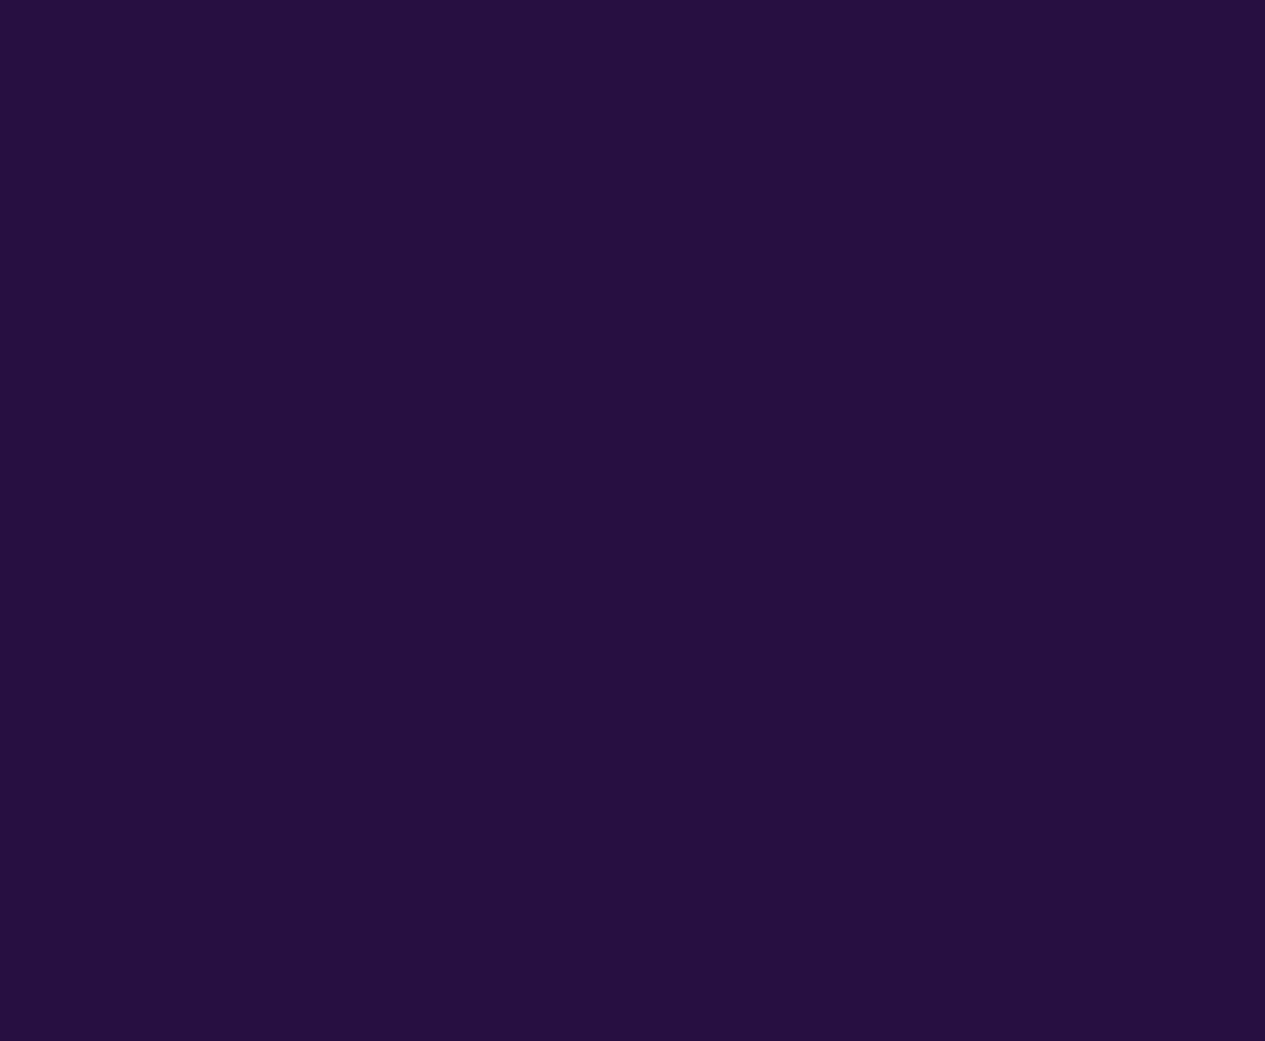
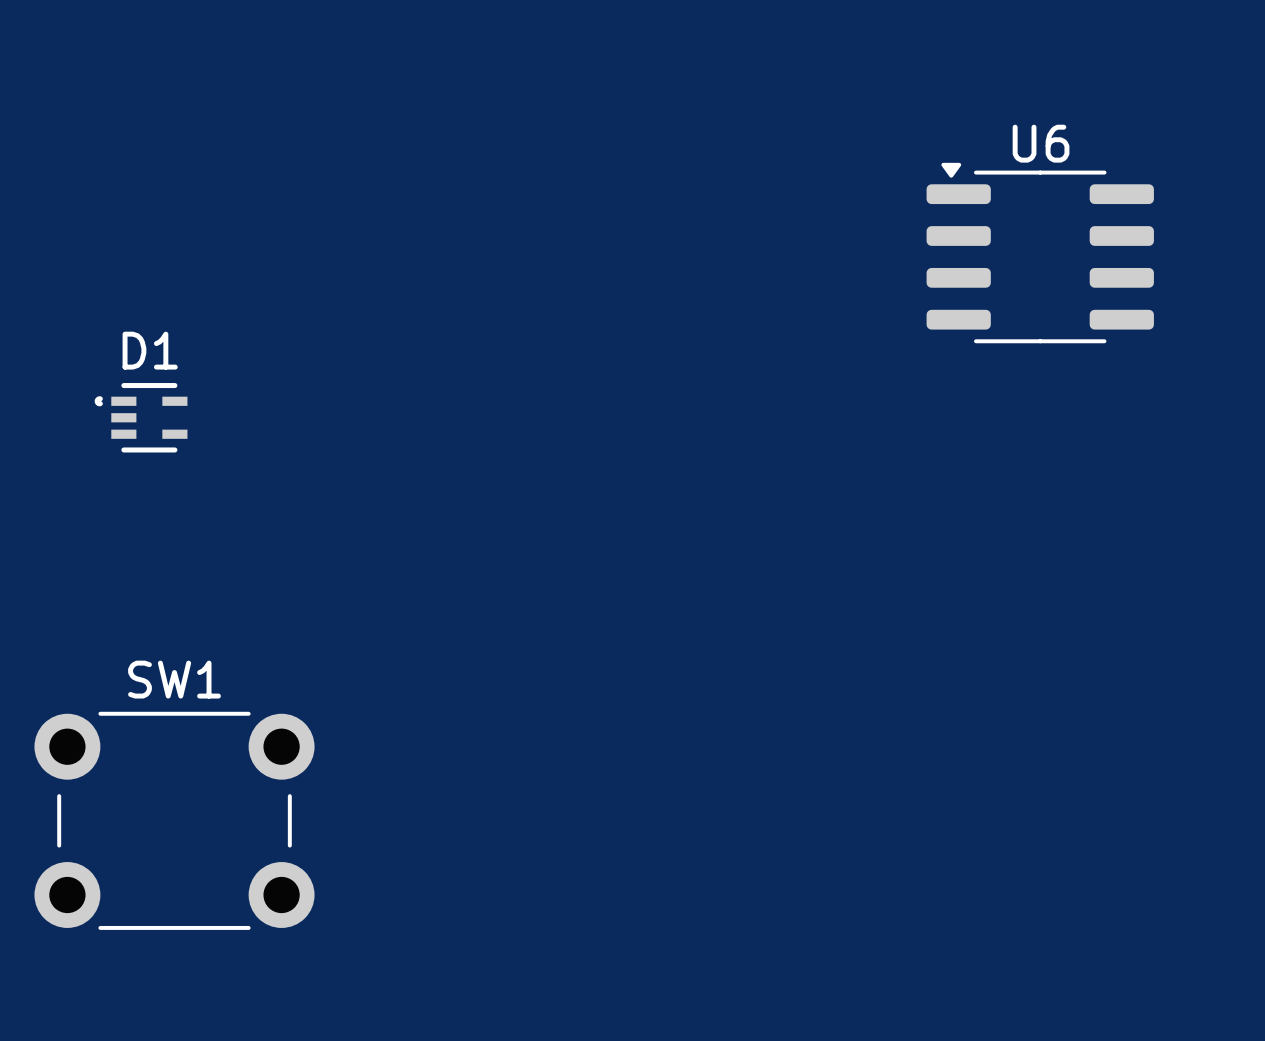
U6: none -> (1040, 253)
D1: none -> (141, 417)
SW1: none -> (174, 820)

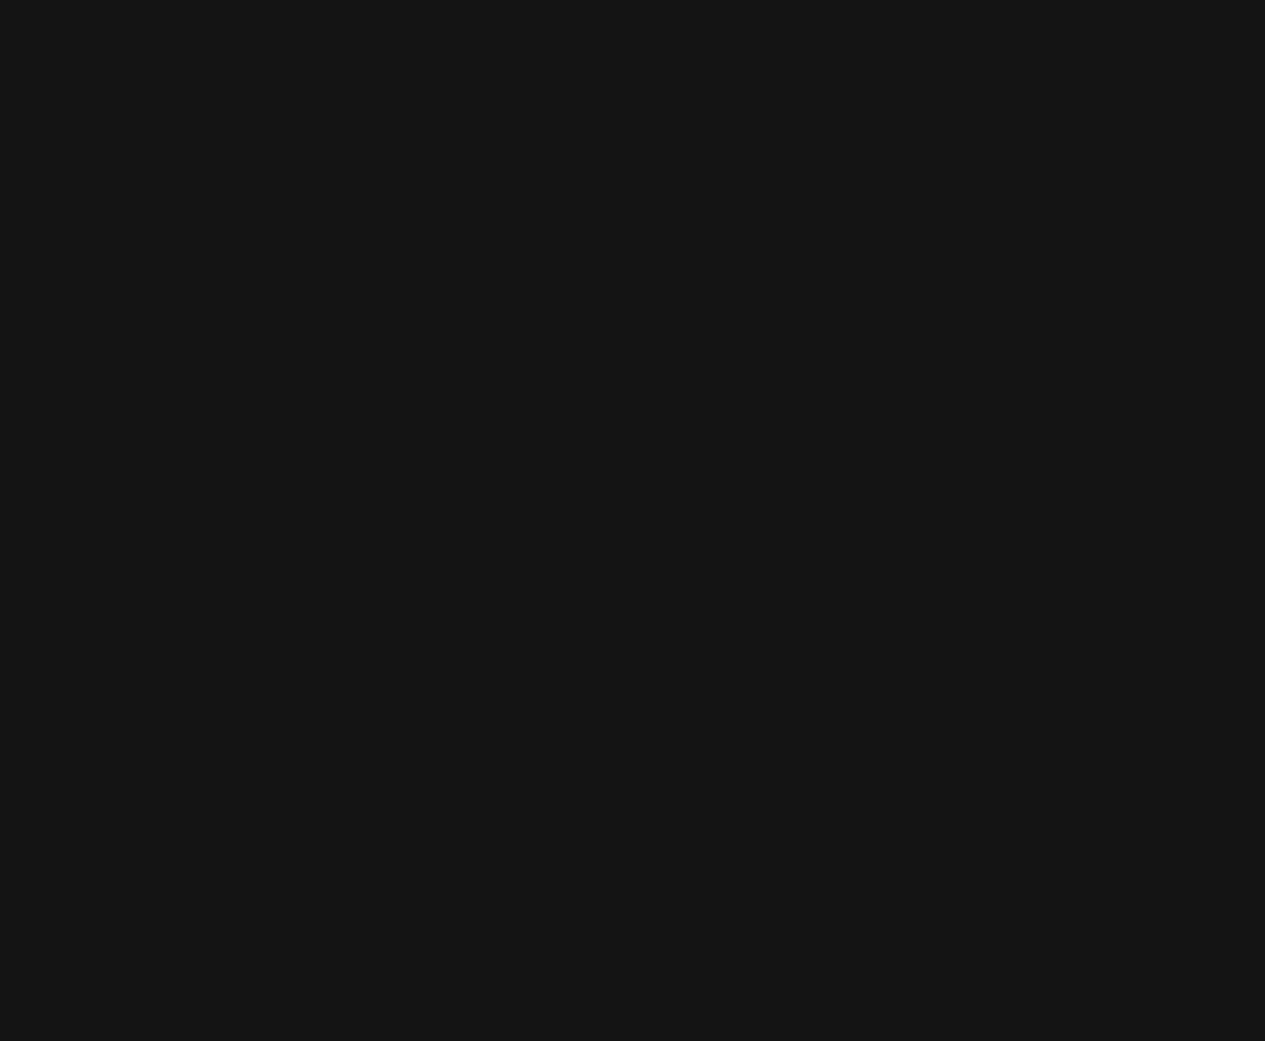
U6: (1040, 253) -> none
D1: (141, 417) -> none
SW1: (174, 820) -> none

